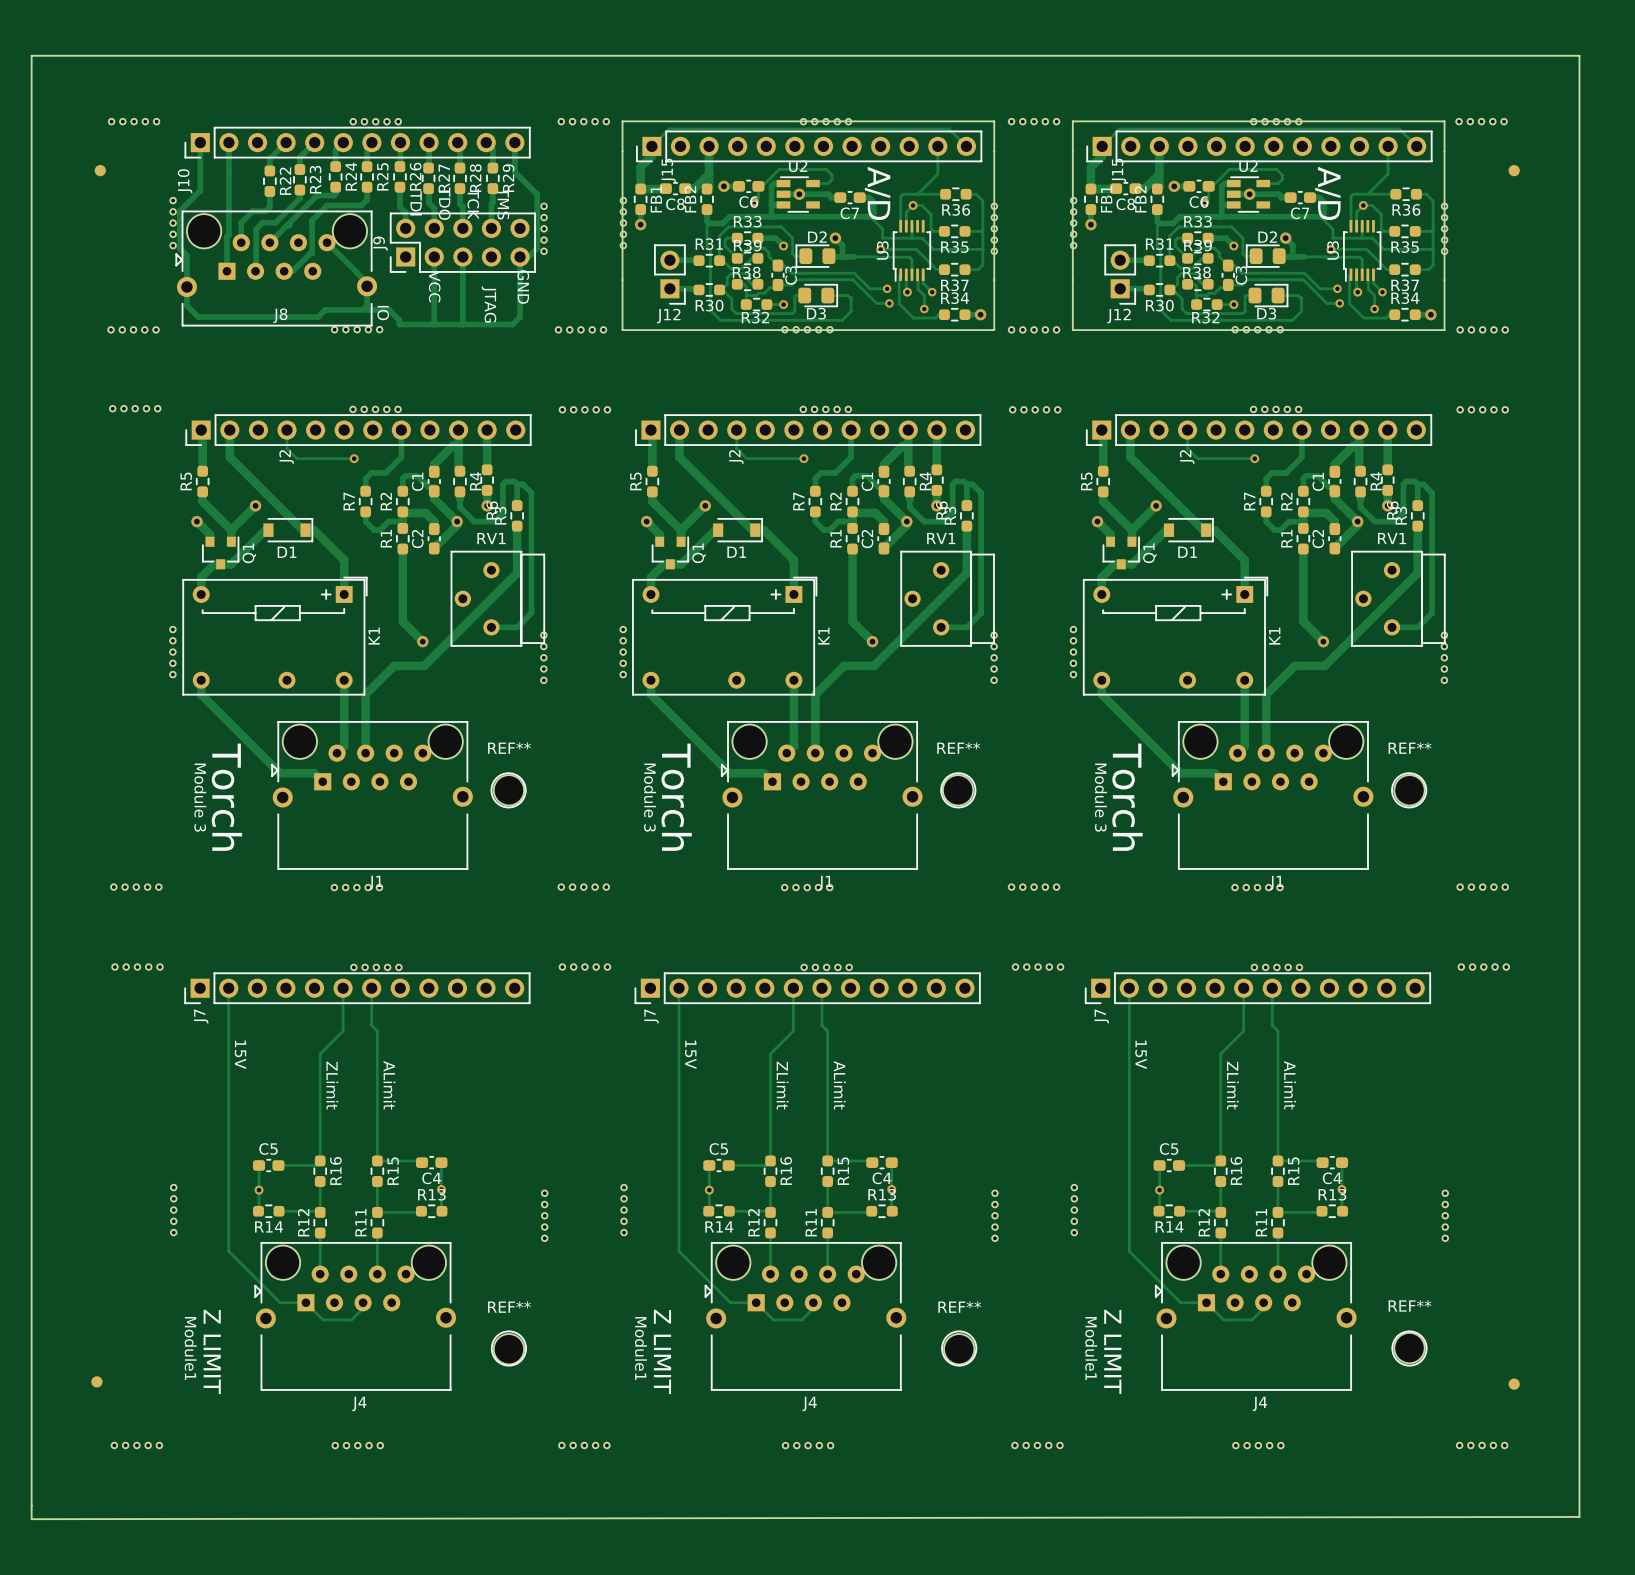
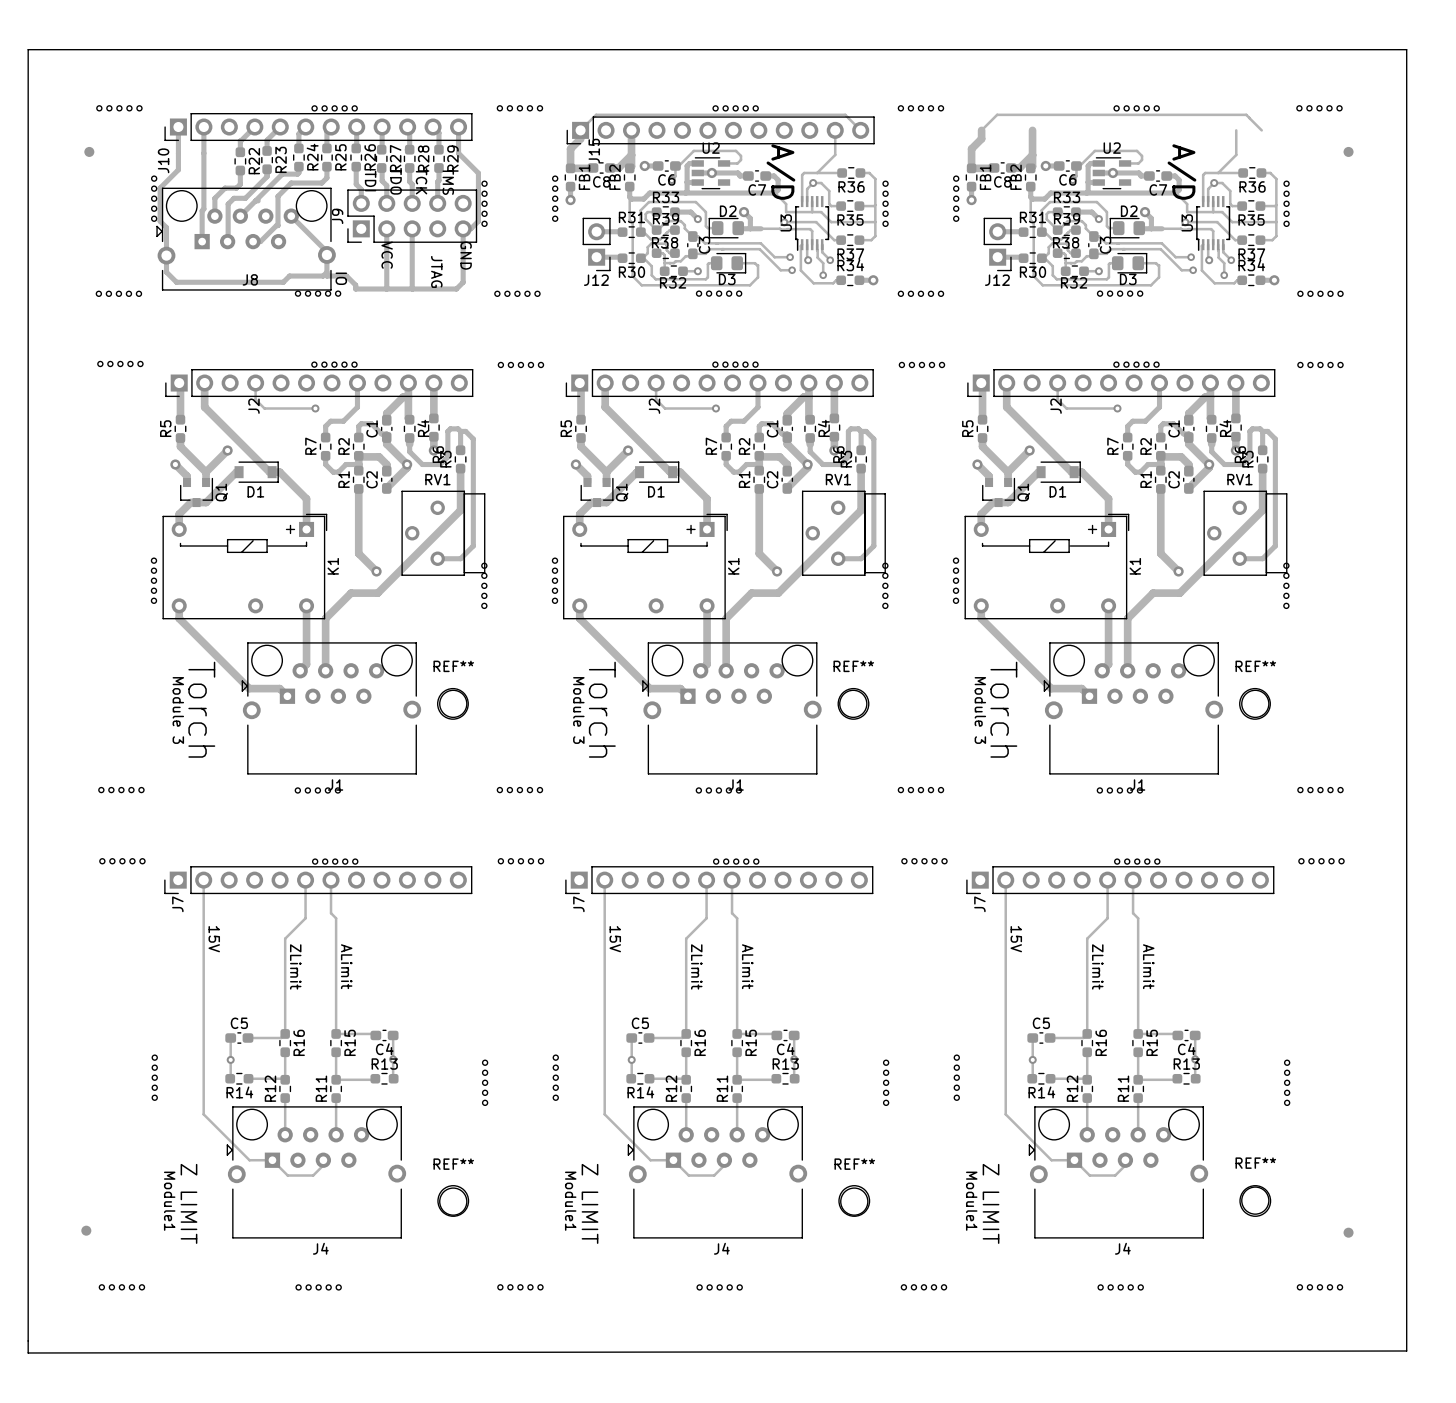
board edge: (622, 121) (994, 121) (994, 330) (622, 330) (622, 121) -> none
board edge: (1072, 121) (1072, 330) (1444, 330) (1444, 121) (1072, 121) -> none
J15: (1259, 146) -> none

